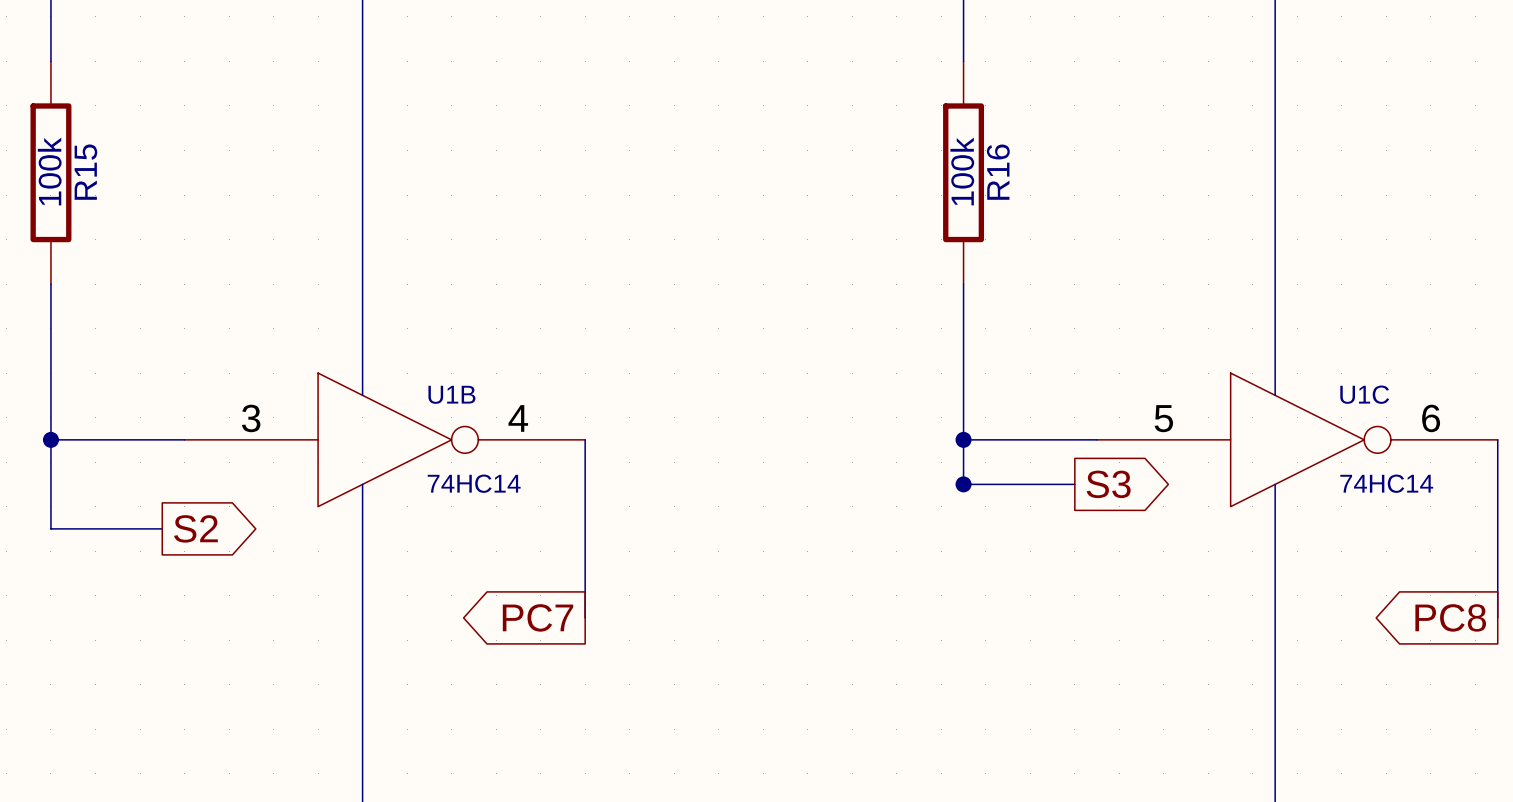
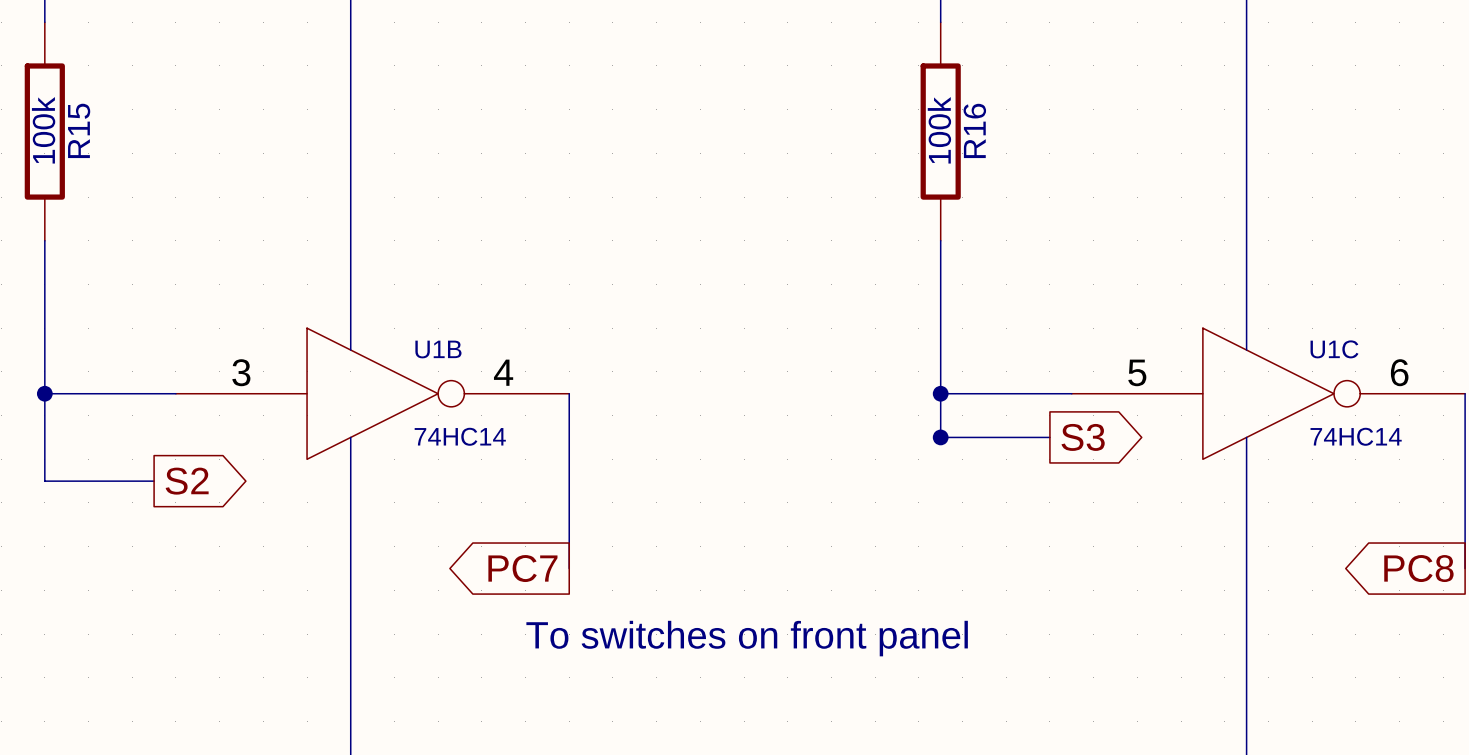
text: none -> To switches on front panel (747, 638)

